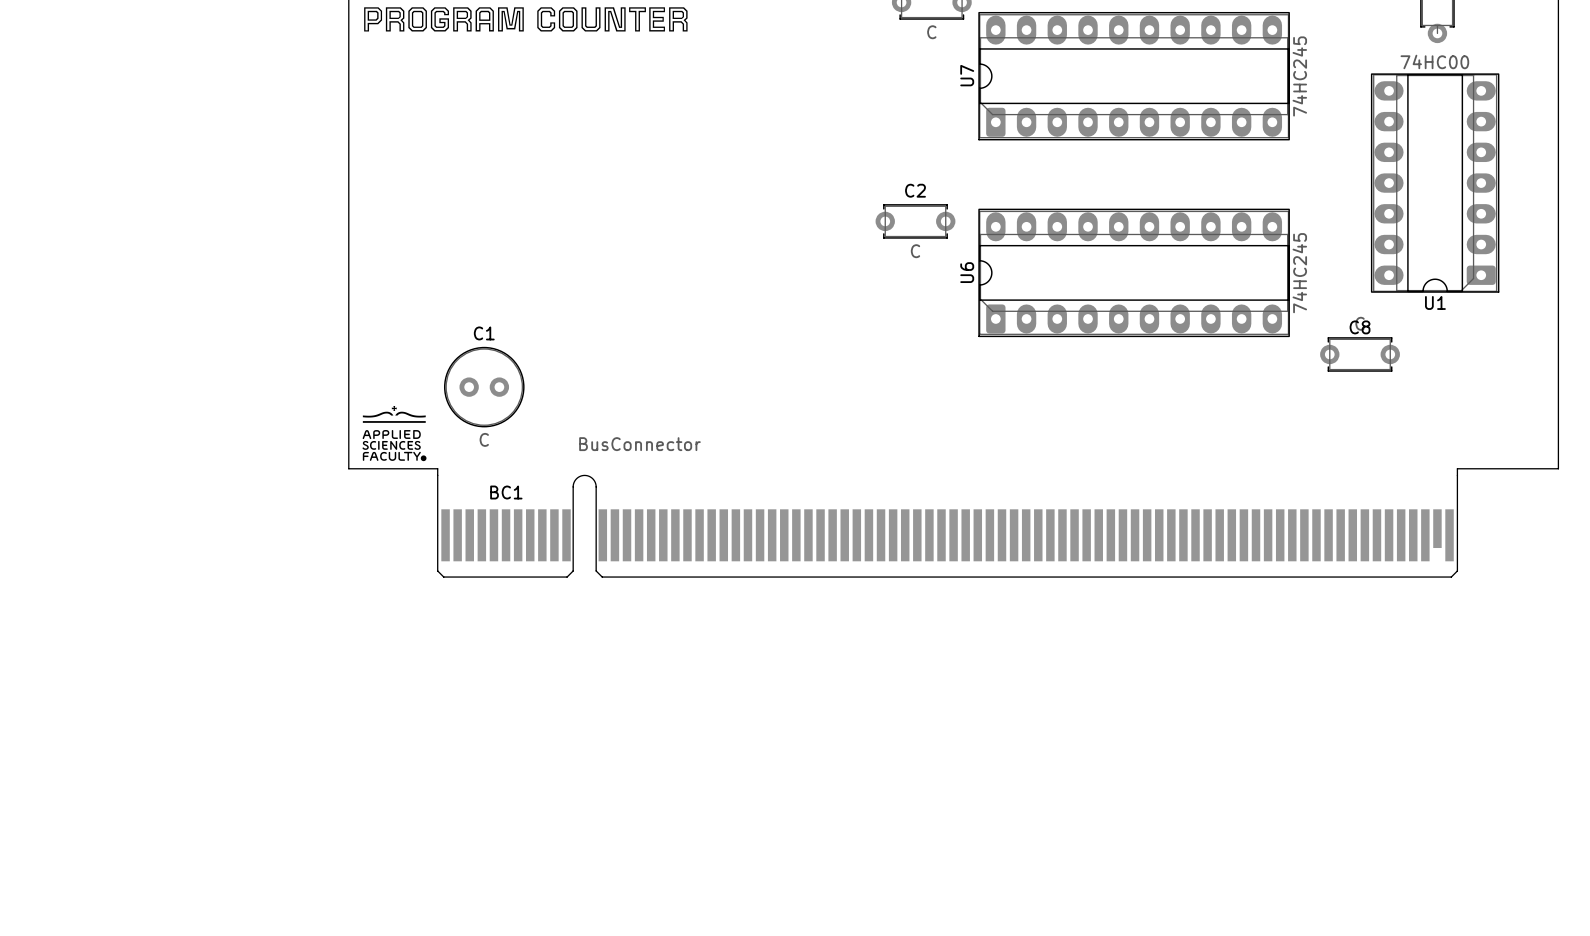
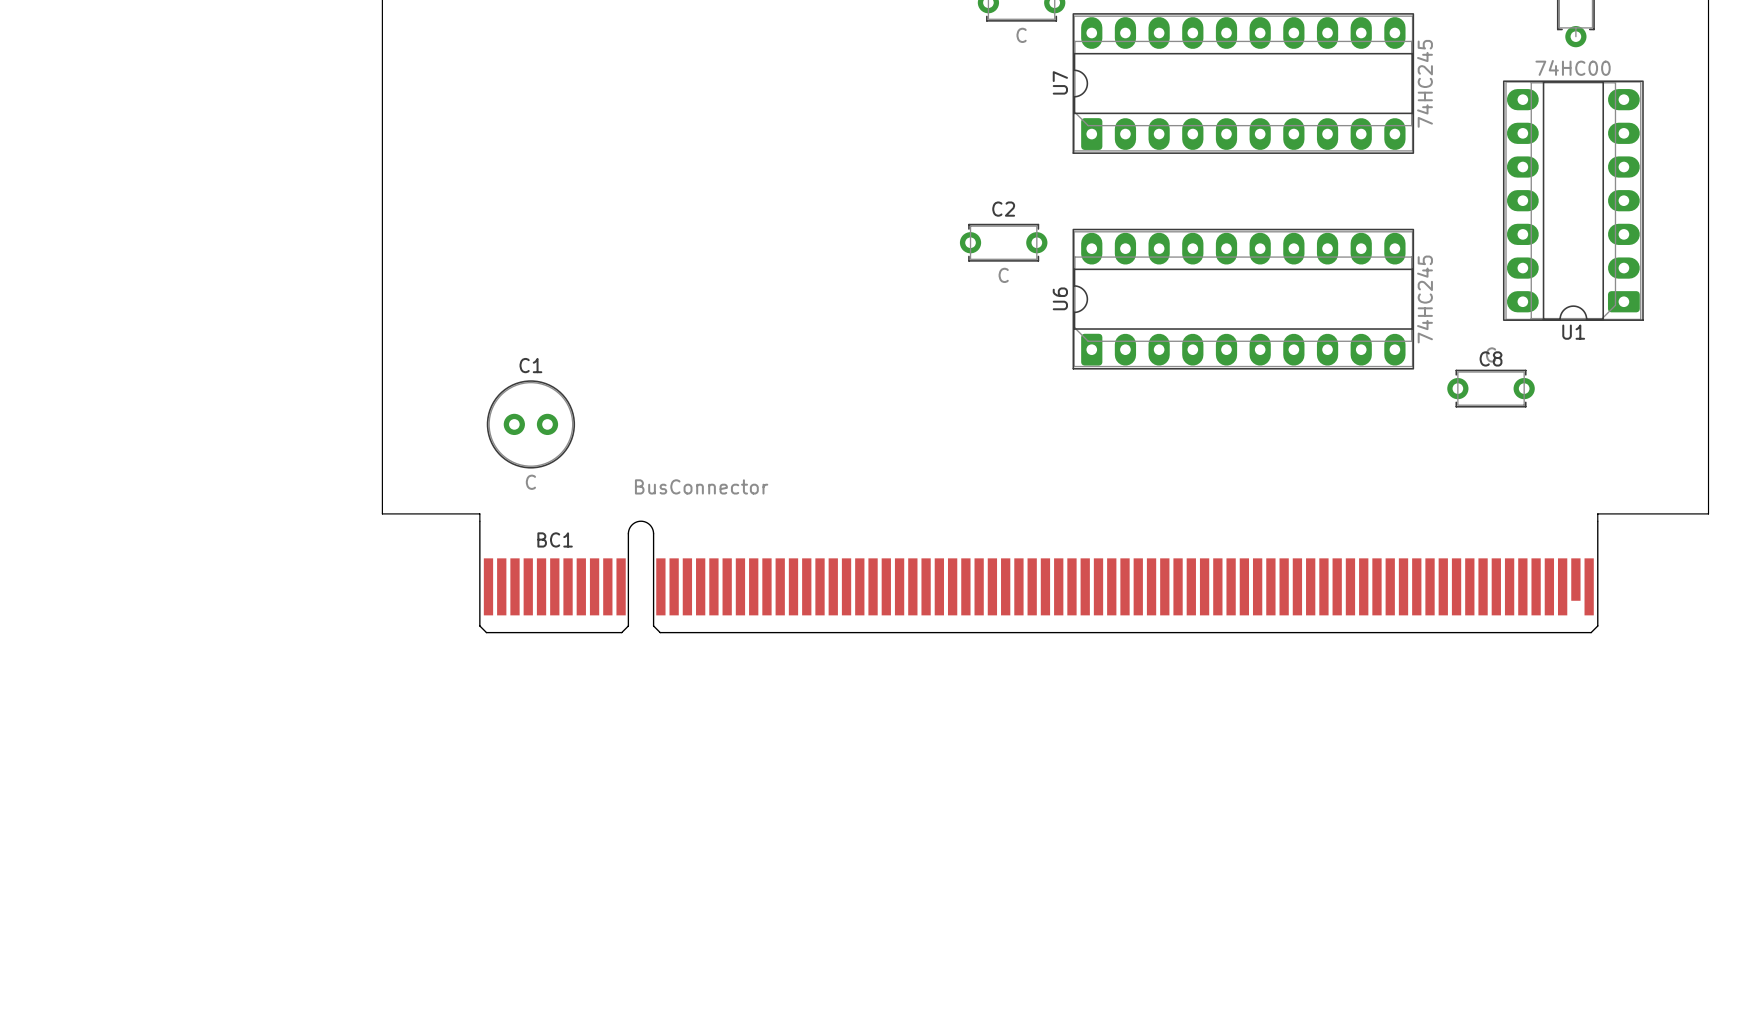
drawing: [364, 7, 688, 32] -> none
drawing: [362, 405, 427, 462] -> none

